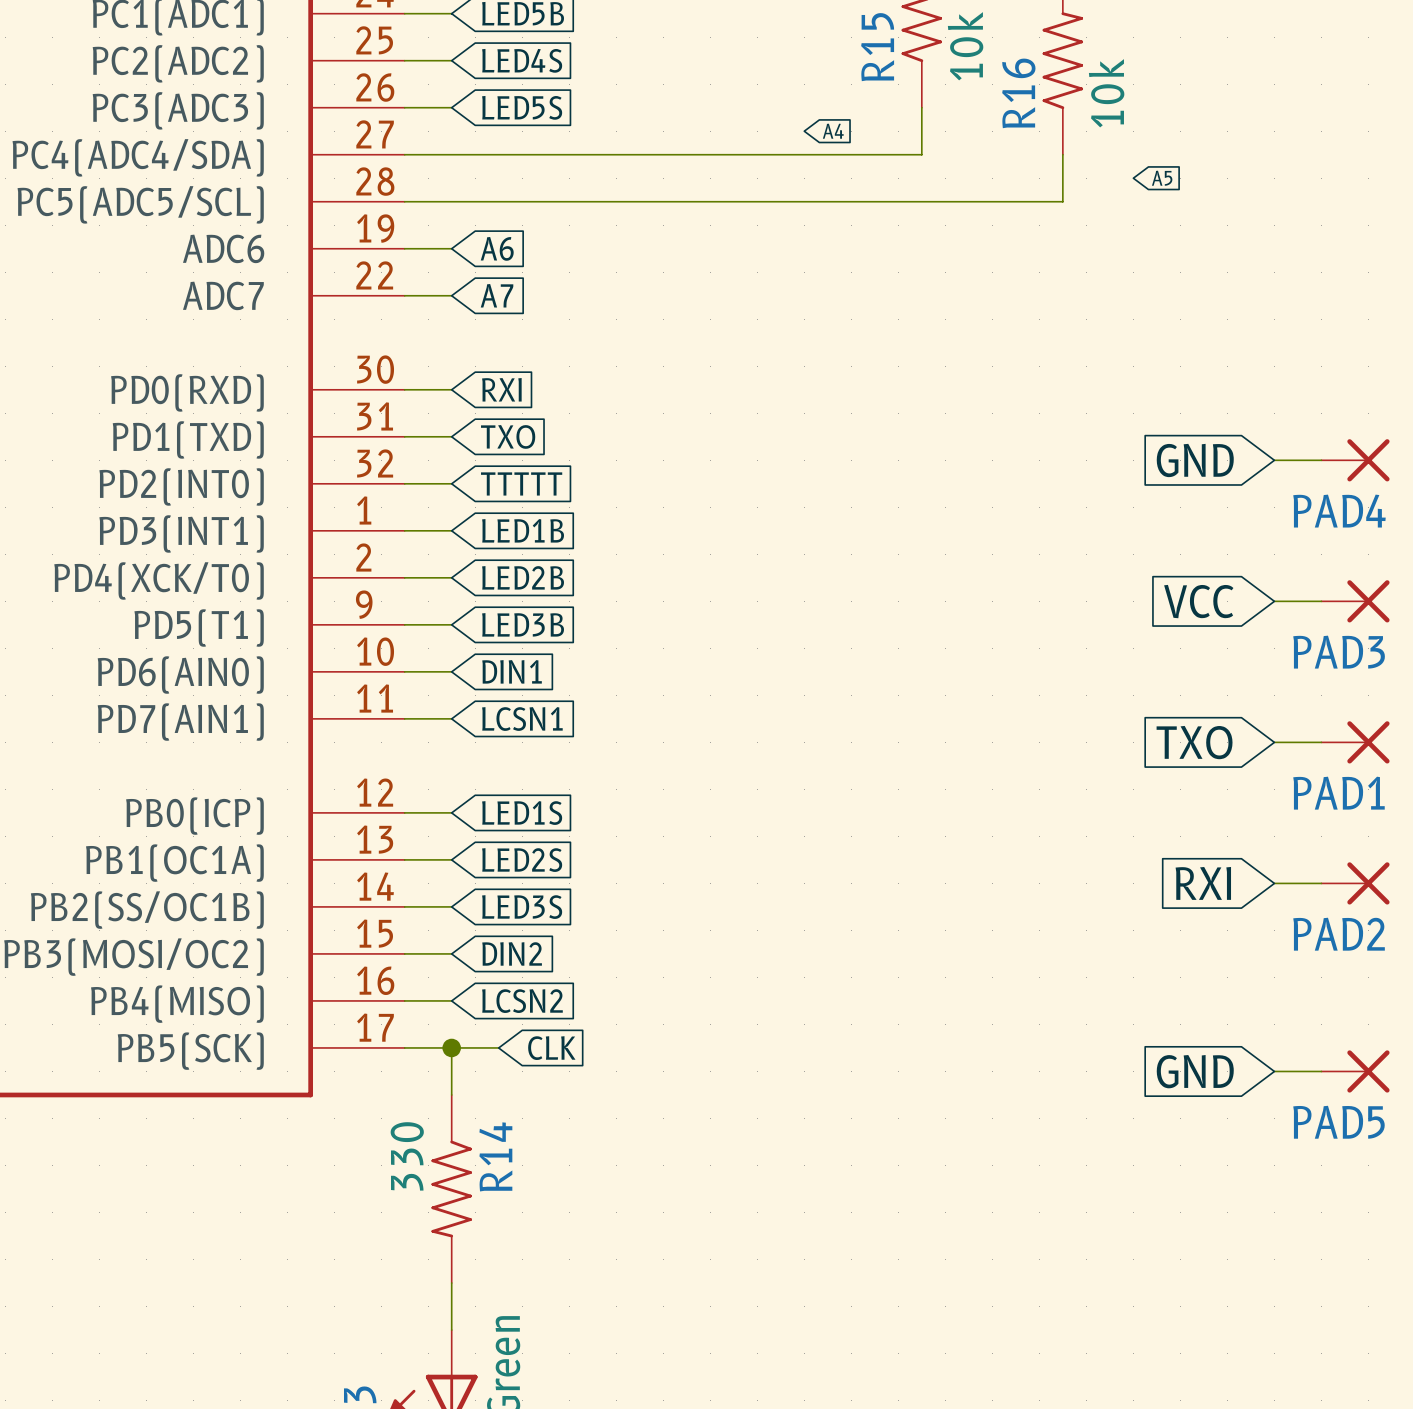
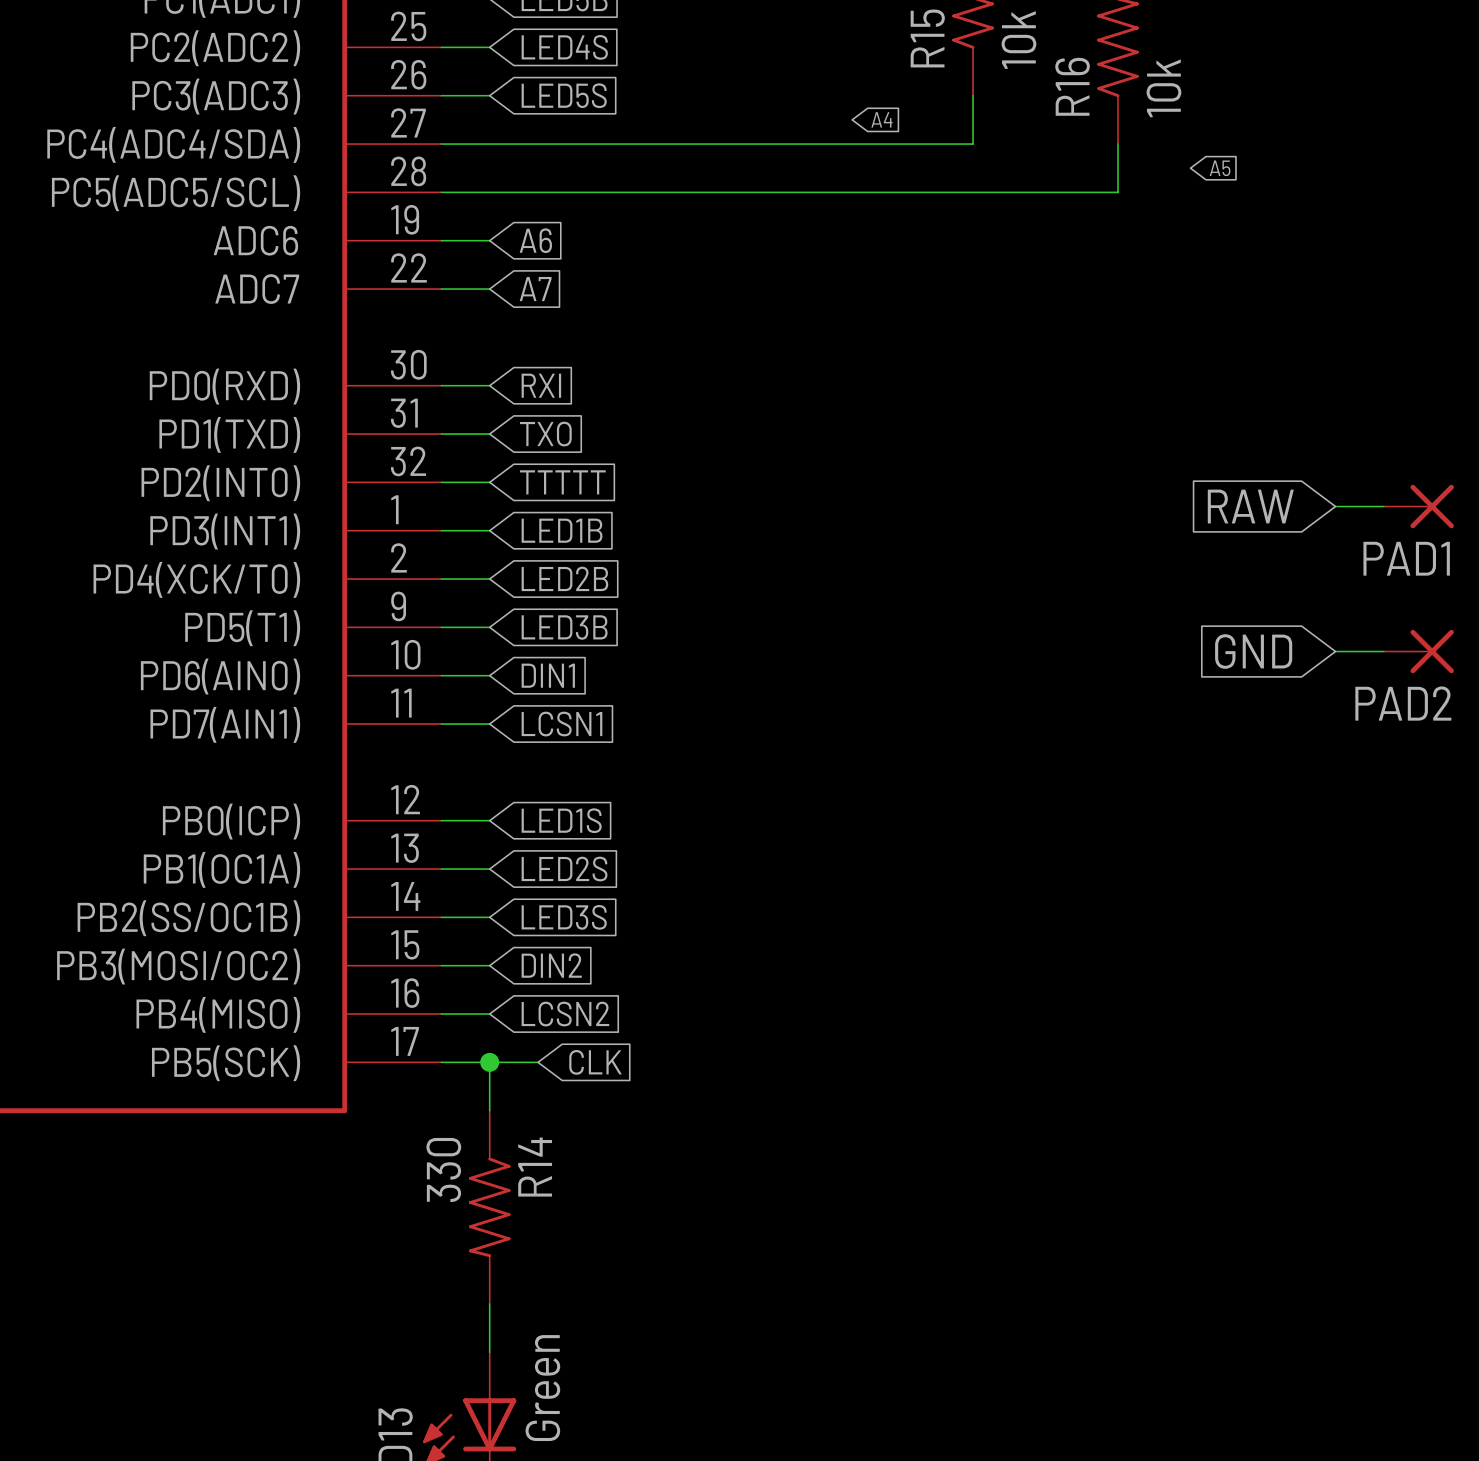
global label position: GND (1195, 460) -> GND (1253, 651)
wire: (1274, 460) (1321, 460) -> (1335, 506) (1383, 506)
PAD4: (1355, 460) -> none
global label: none -> RAW (1250, 506)
global label: VCC (1198, 601) -> none
wire: (1274, 601) (1321, 601) -> (1335, 651) (1383, 651)
PAD3: (1355, 601) -> none
global label: TXO (1194, 742) -> none
wire: (1274, 742) (1321, 742) -> none
PAD1 position: (1355, 742) -> (1418, 506)
global label: RXI (1203, 883) -> none
wire: (1274, 883) (1321, 883) -> none
PAD2 position: (1355, 883) -> (1418, 651)
global label: GND (1195, 1071) -> none
wire: (1274, 1071) (1321, 1071) -> none
PAD5: (1355, 1071) -> none

